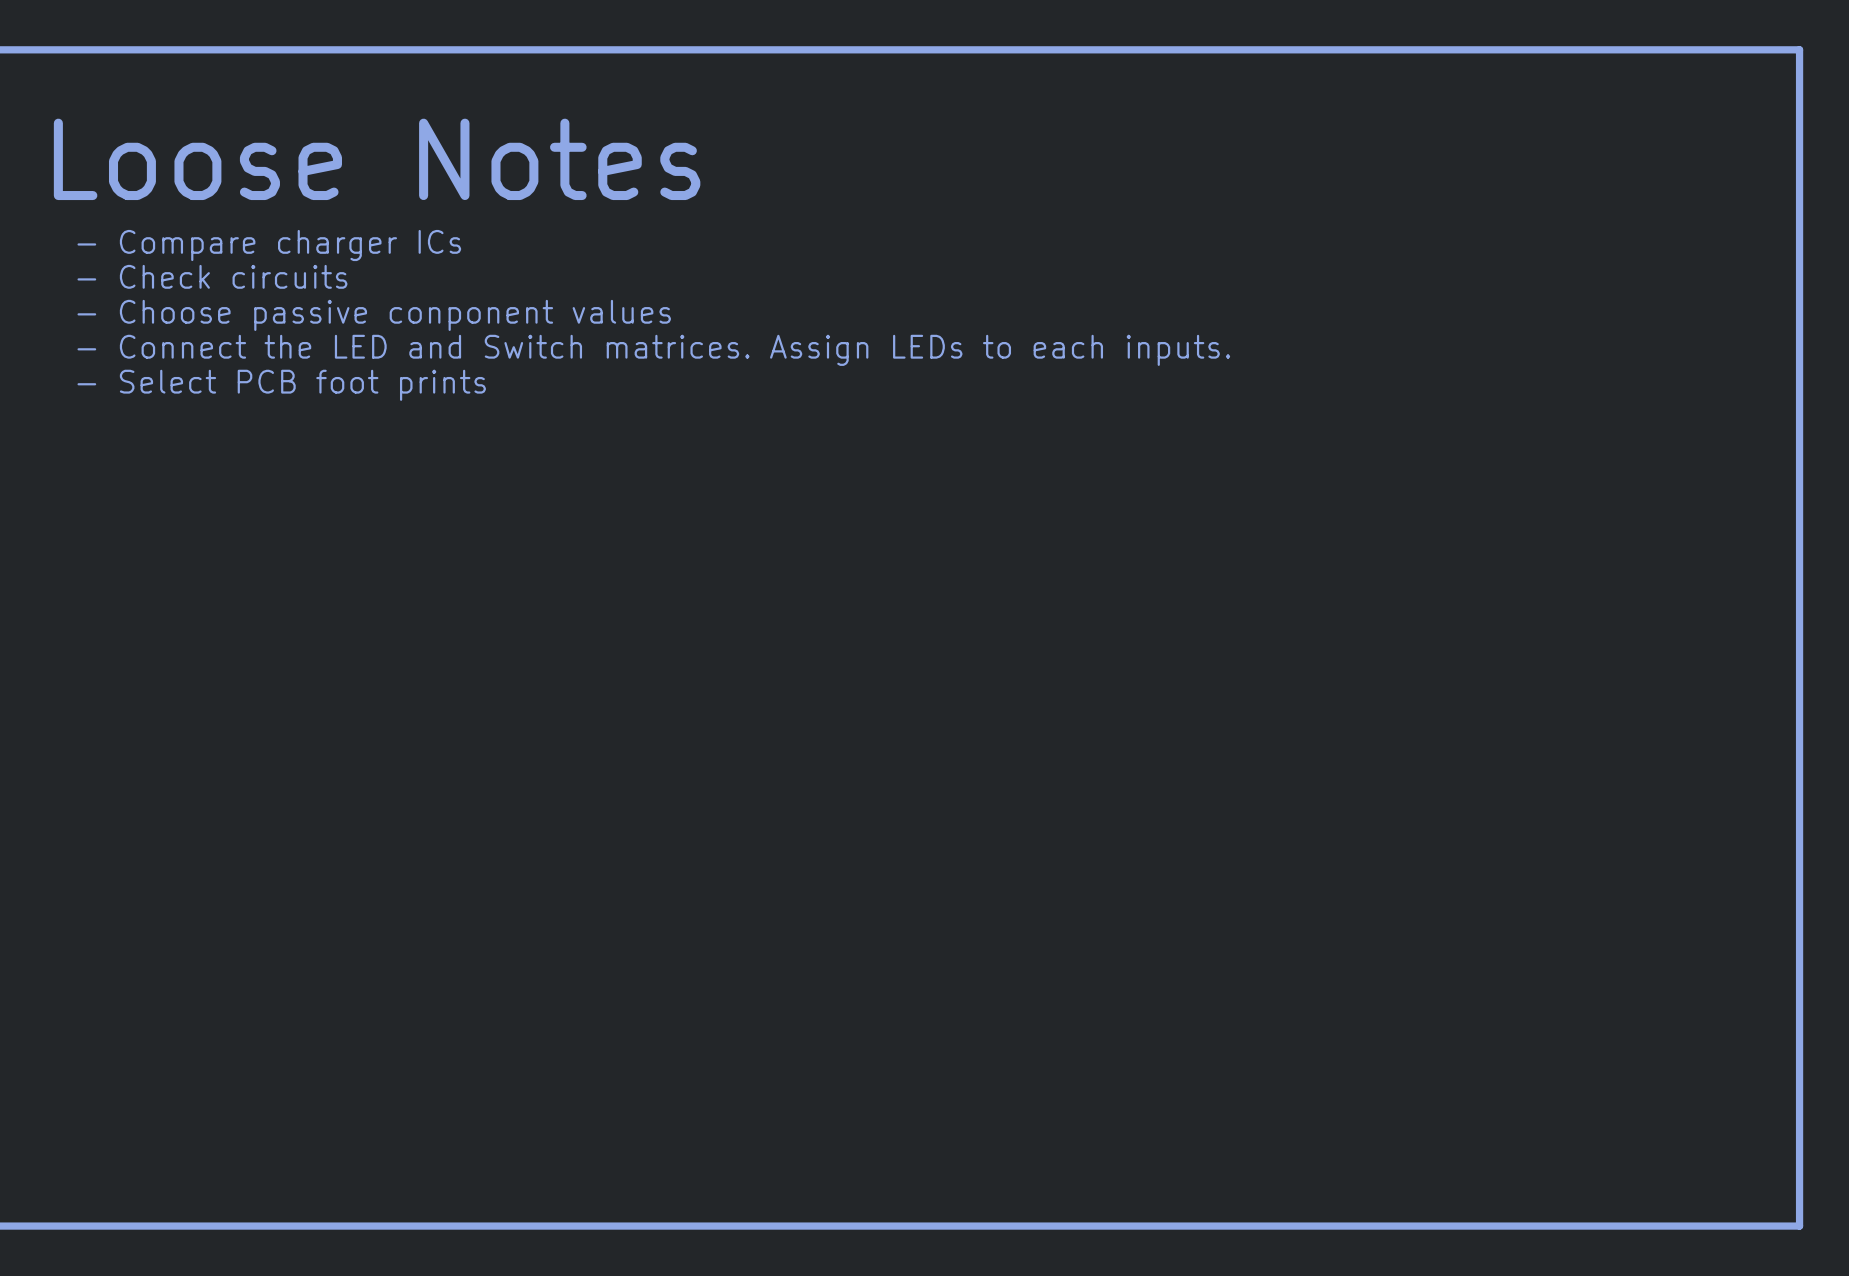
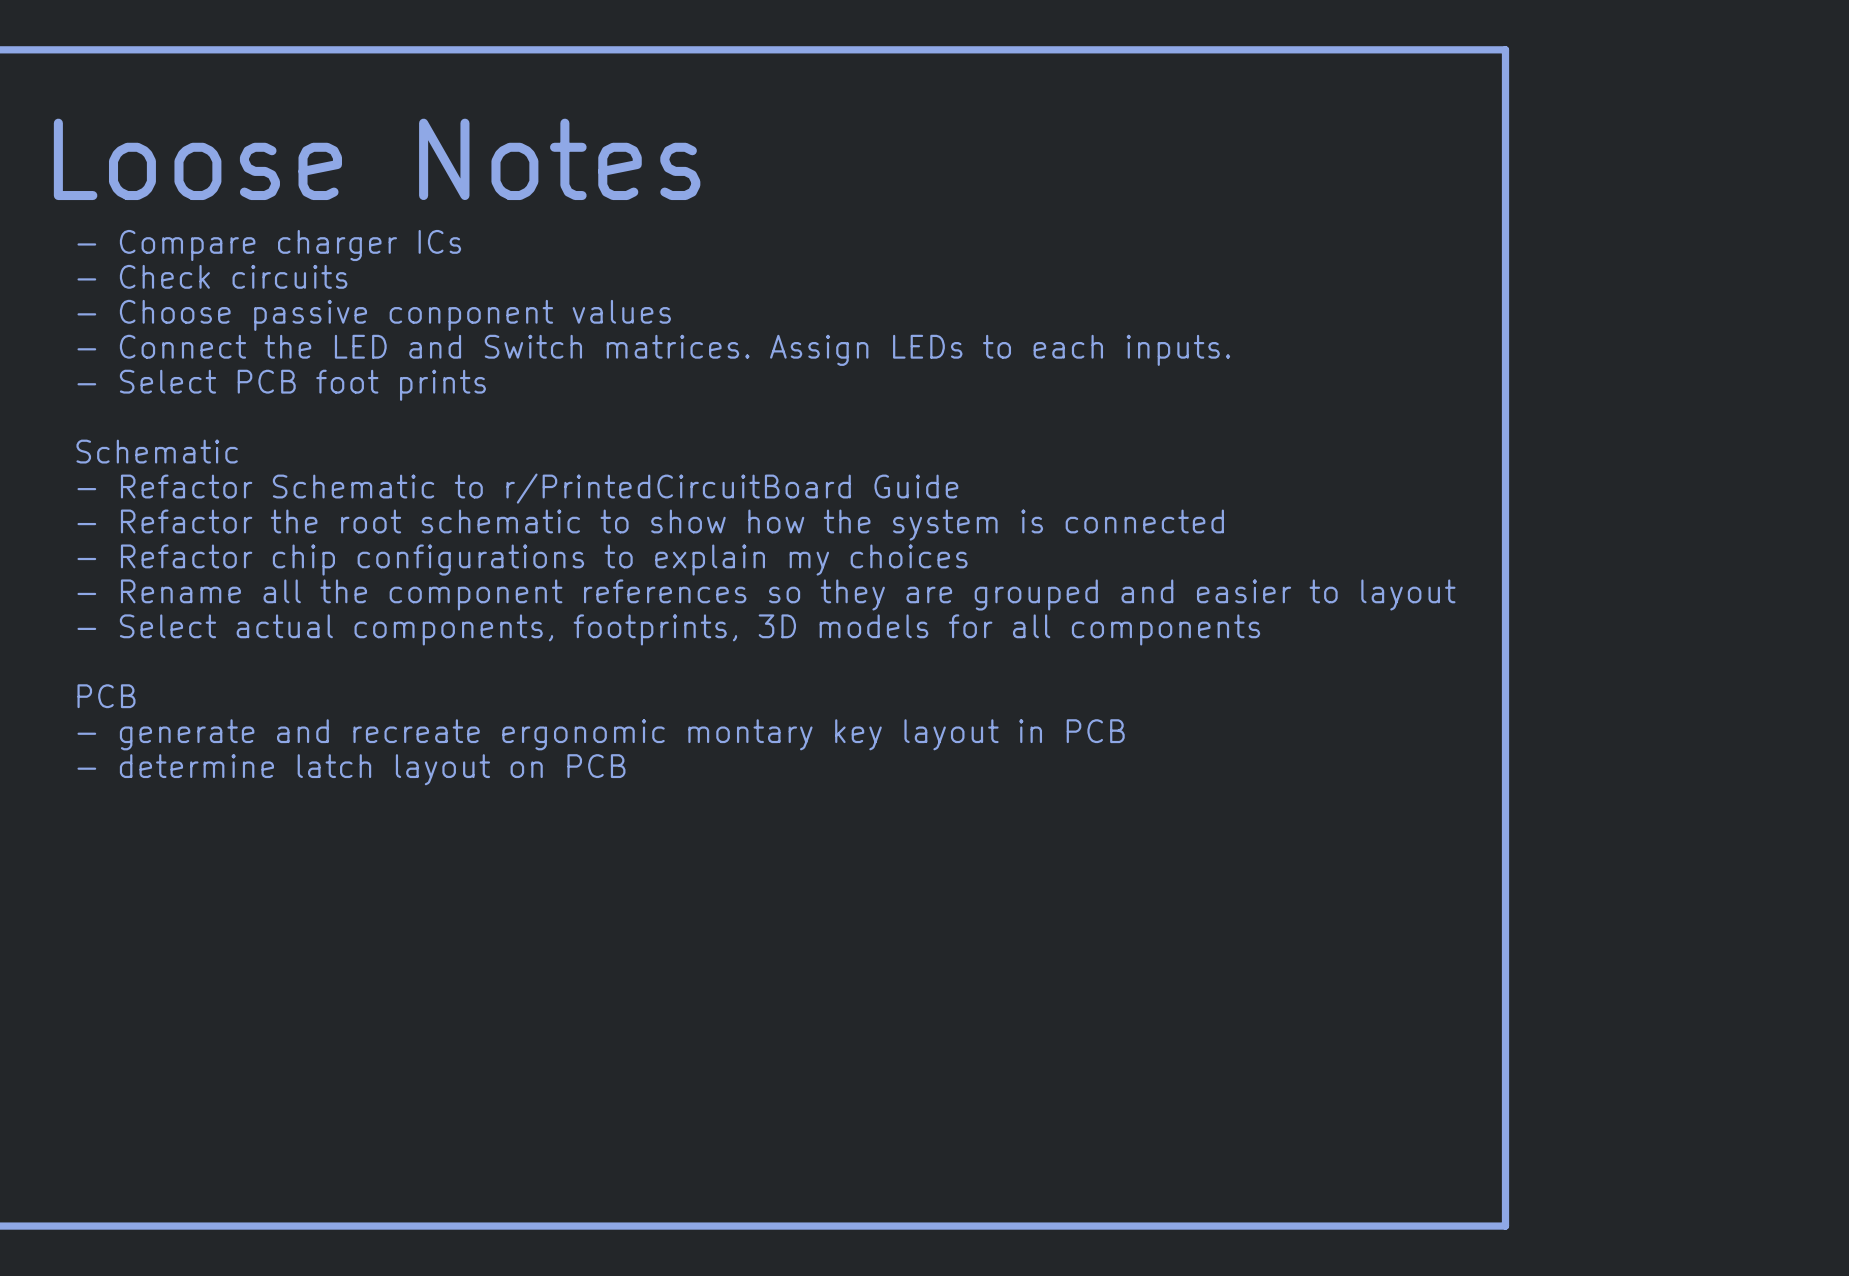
line: (1505, 49) (1799, 49) (1799, 1226) (1505, 1226) -> (1505, 49) (1505, 1226)
text: none -> Schematic (157, 451)
text: none -> - Refactor Schematic to r/PrintedCircuitBoard Guide (517, 488)
text: none -> - Refactor the root schematic to show how the system is connected (650, 525)
text: none -> - Refactor chip configurations to explain my choices (522, 560)
text: none -> - Rename all the component references so they are grouped and easier to layout (766, 594)
text: none -> - Select actual components, footprints, 3D models for all components (668, 629)
text: none -> PCB (106, 696)
text: none -> - generate and recreate ergonomic montary key layout in PCB (601, 734)
text: none -> - determine latch layout on PCB (351, 769)

